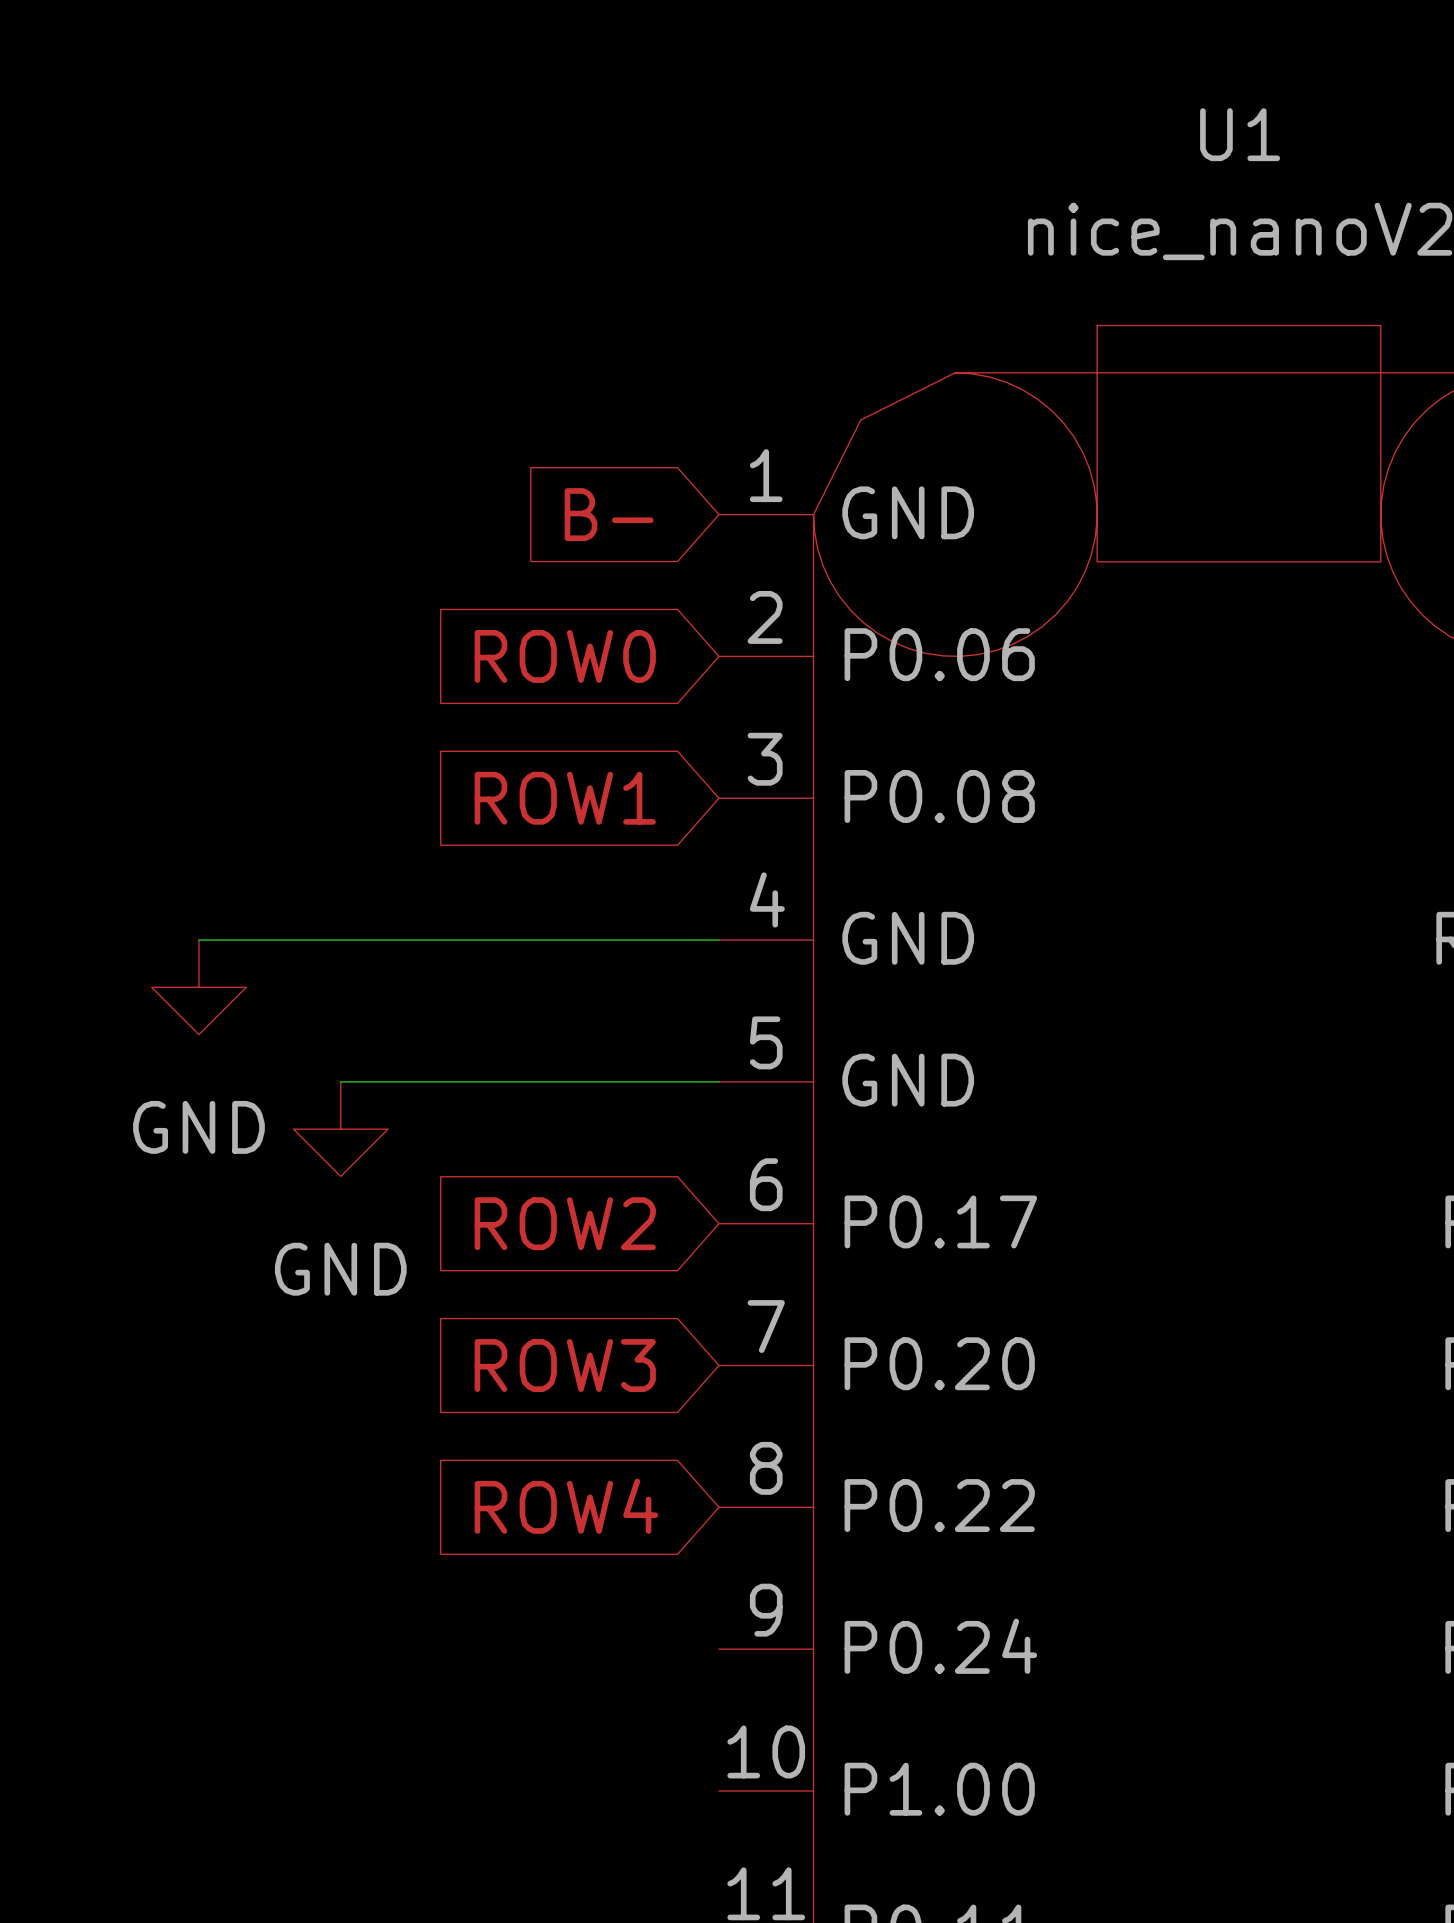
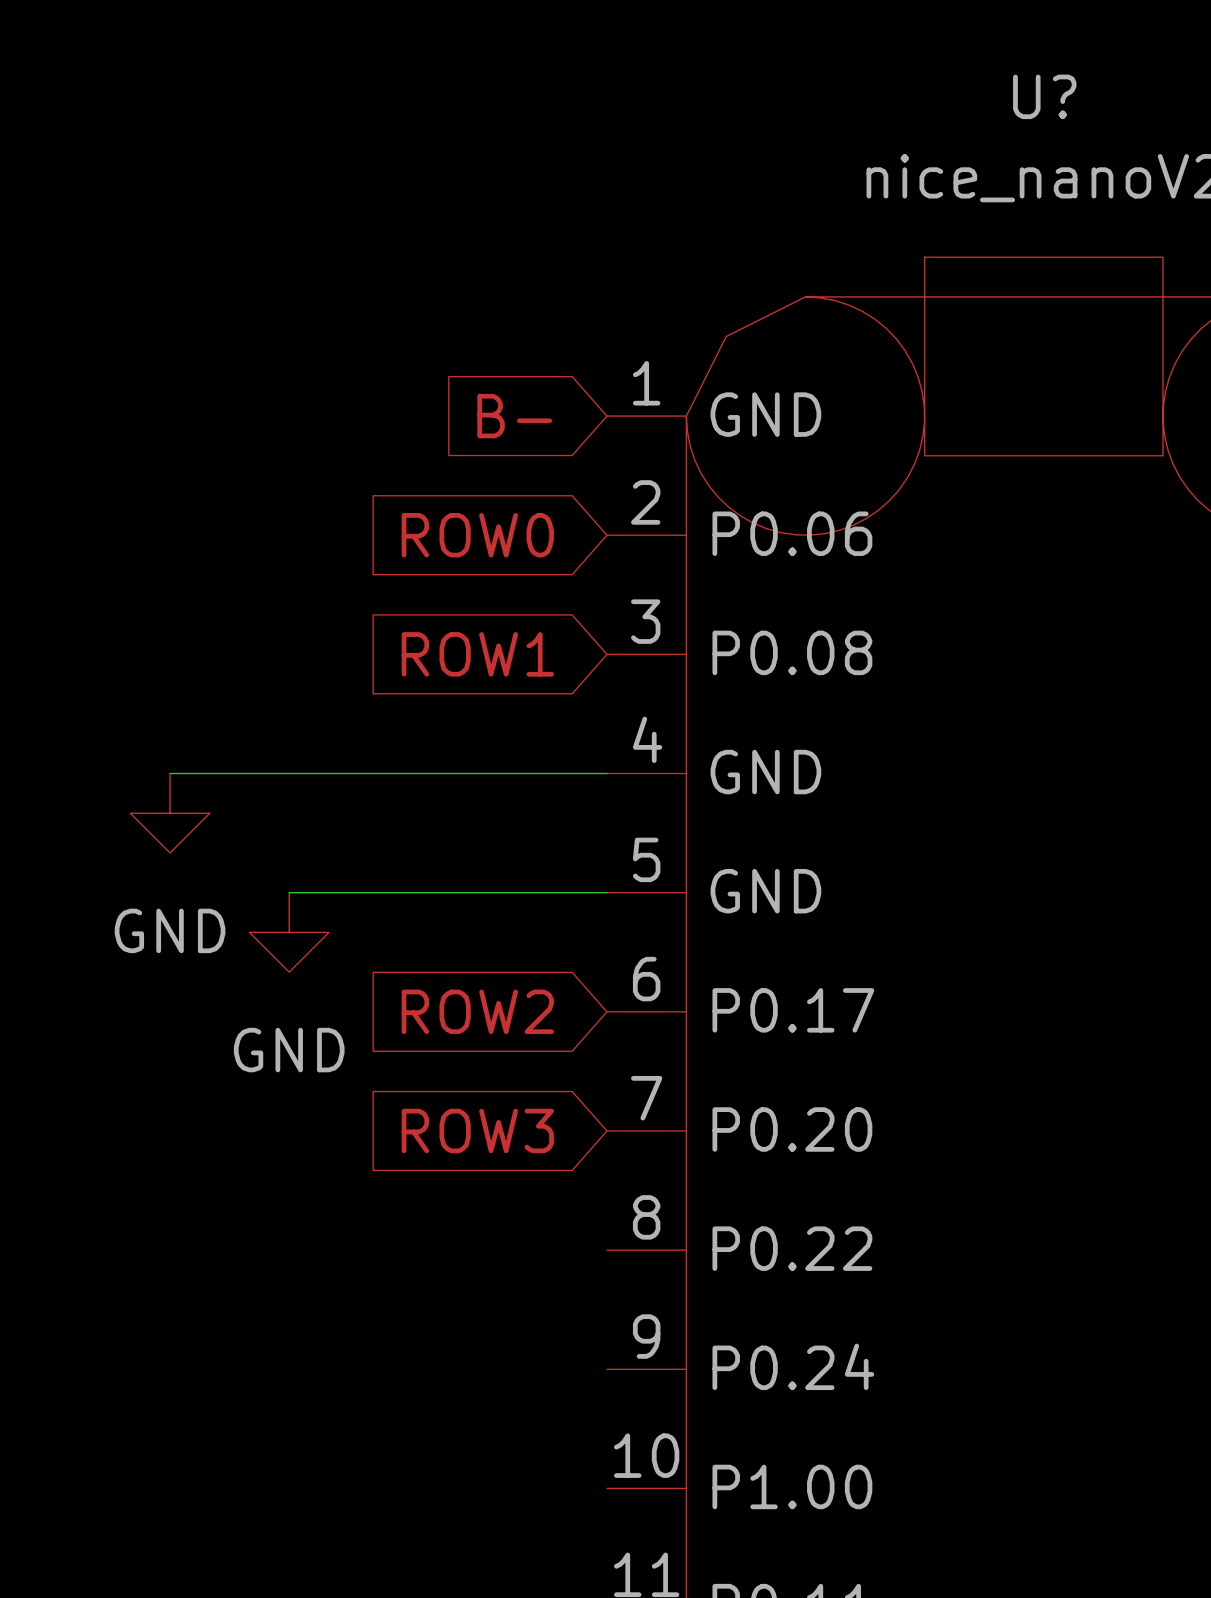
U1 name: U1 (1240, 134) -> U? (1044, 96)
global label: ROW4 (566, 1506) -> none

